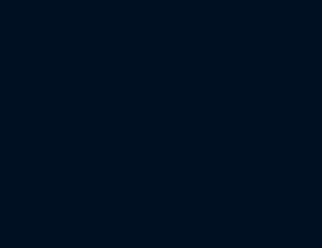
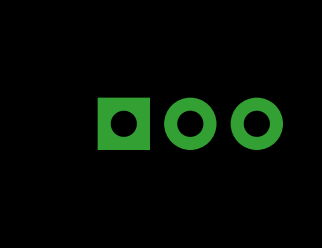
part: none -> (190, 123)

